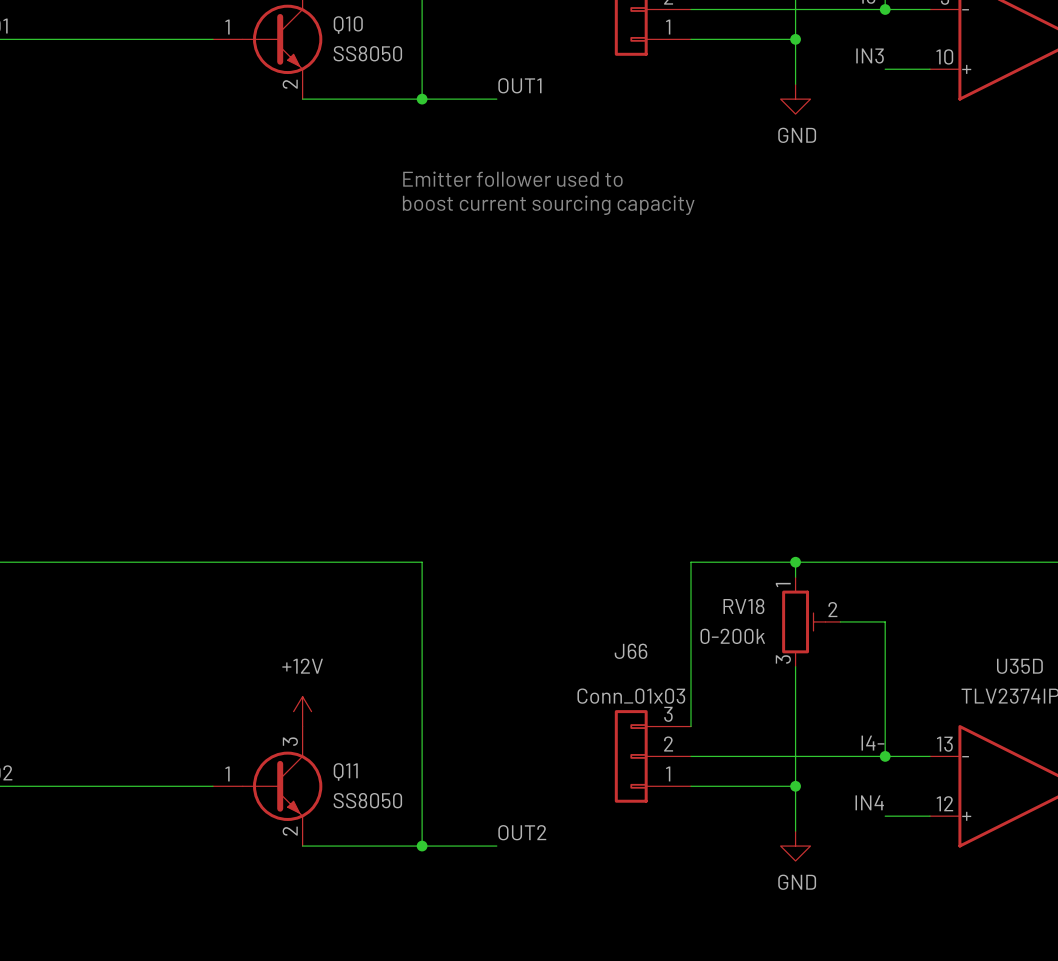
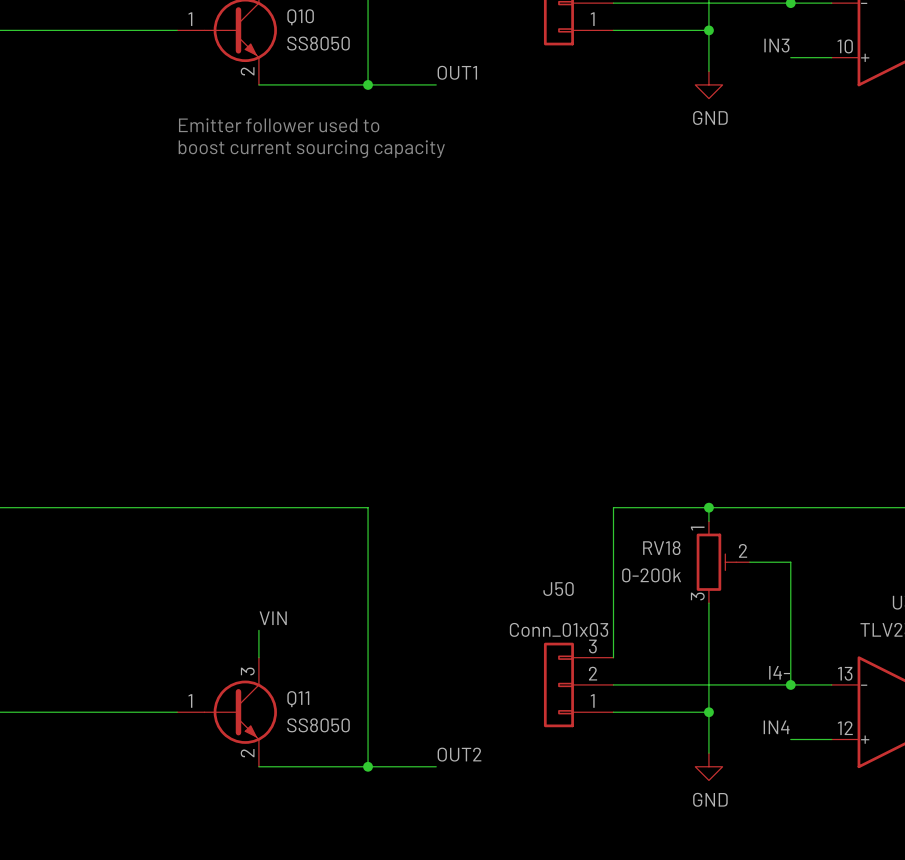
text position: Emitter follower used to (512, 179) -> Emitter follower used to (279, 125)
text position: boost current sourcing capacity (548, 205) -> boost current sourcing capacity (311, 149)
J66 name: J66 (631, 651) -> J50 (558, 589)
label: none -> VIN (273, 618)
power symbol: +12V (302, 711) -> none

